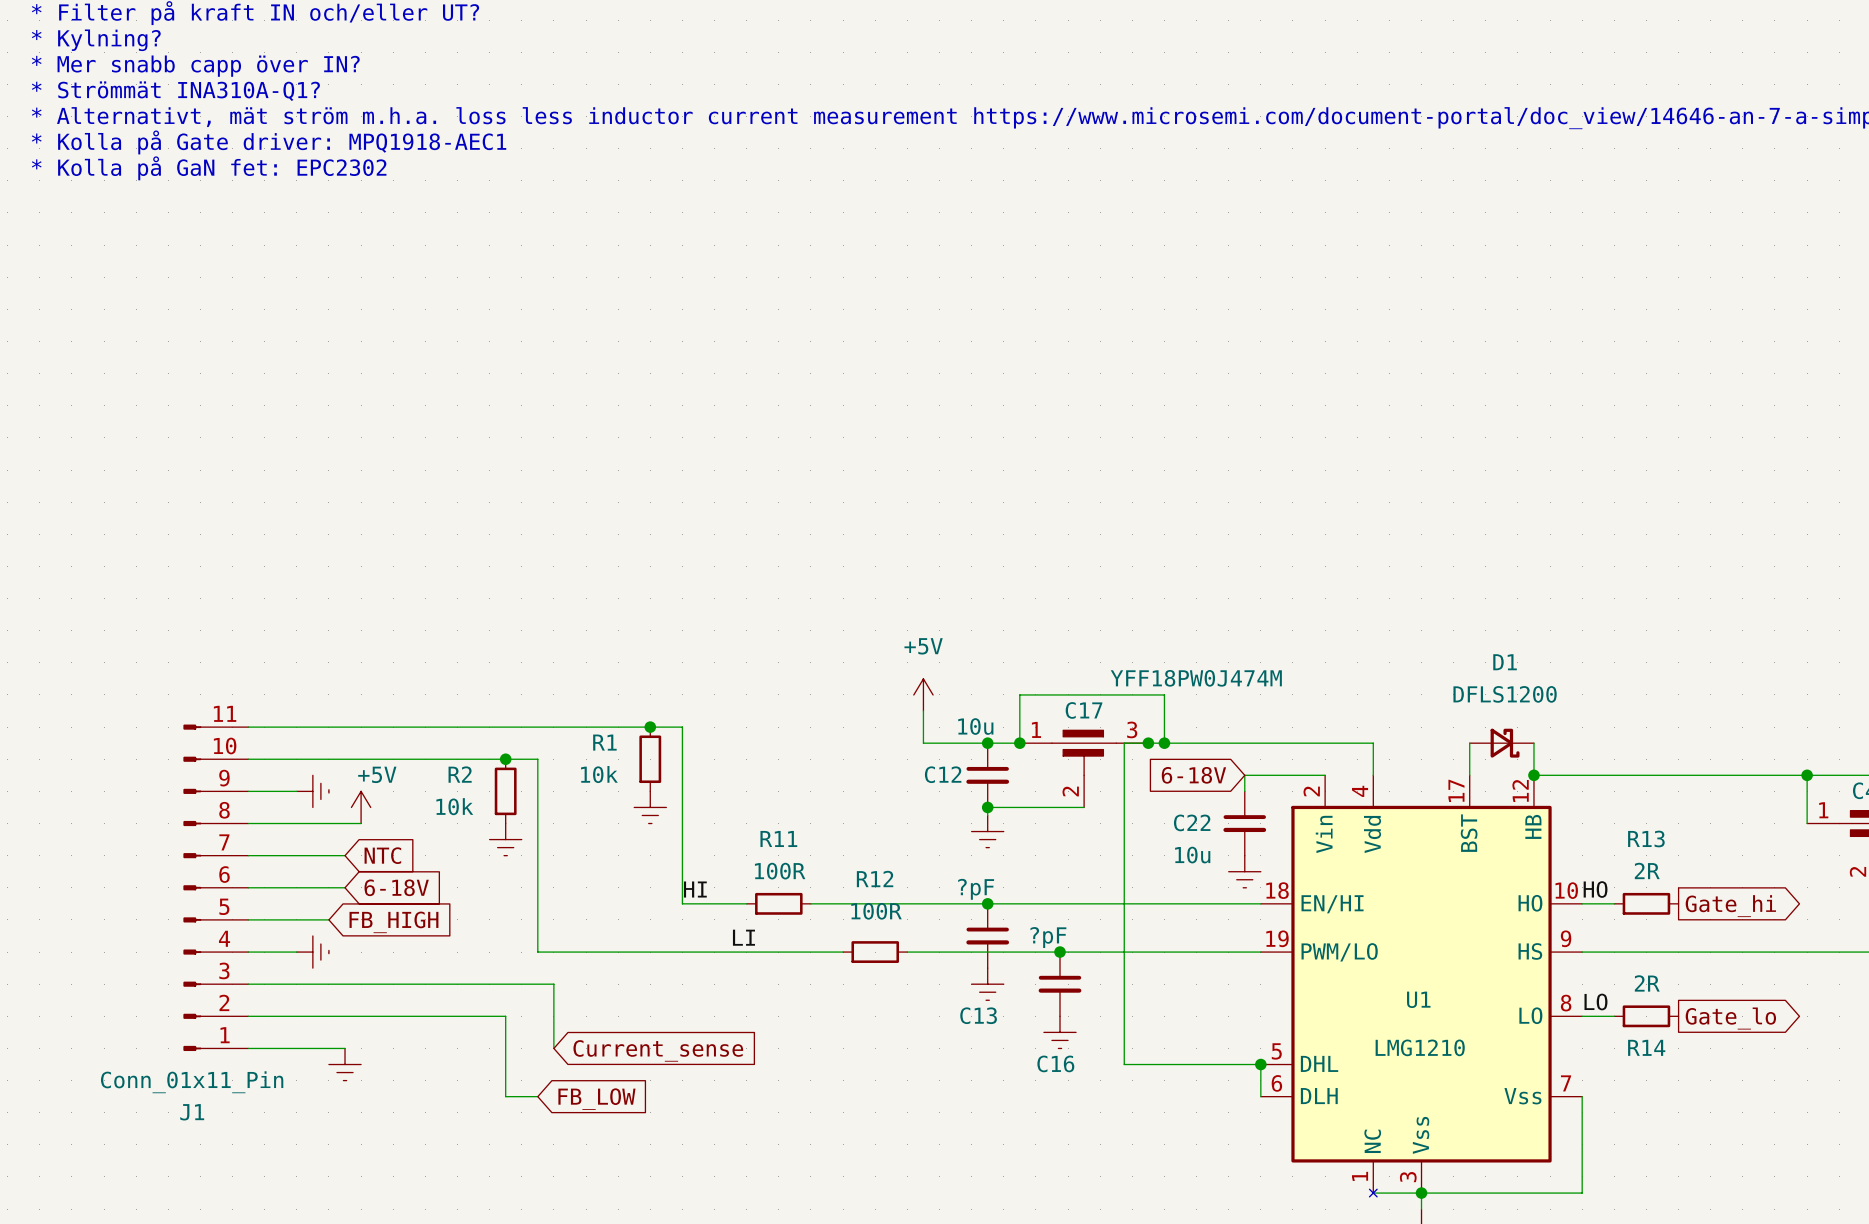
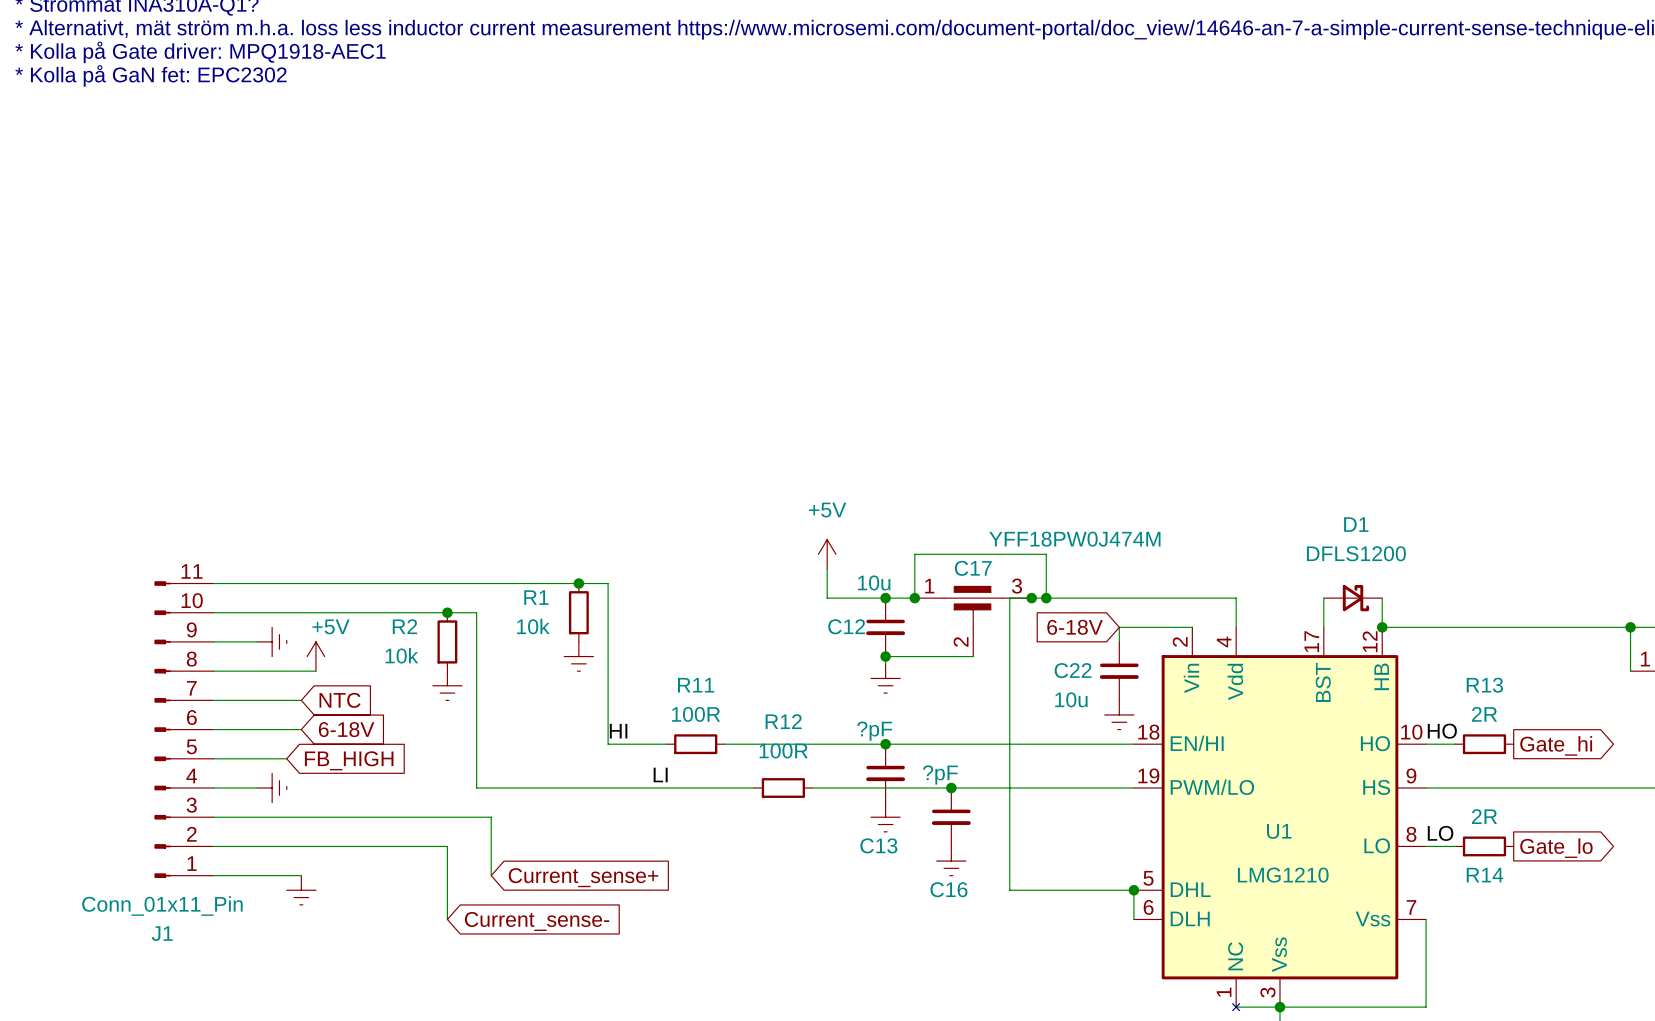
global label: Current_sense (658, 1050) -> Current_sense+ (583, 877)
wire: (505, 1096) (537, 1096) -> none
global label: FB_LOW (596, 1099) -> none
global label: none -> Current_sense- (537, 921)

